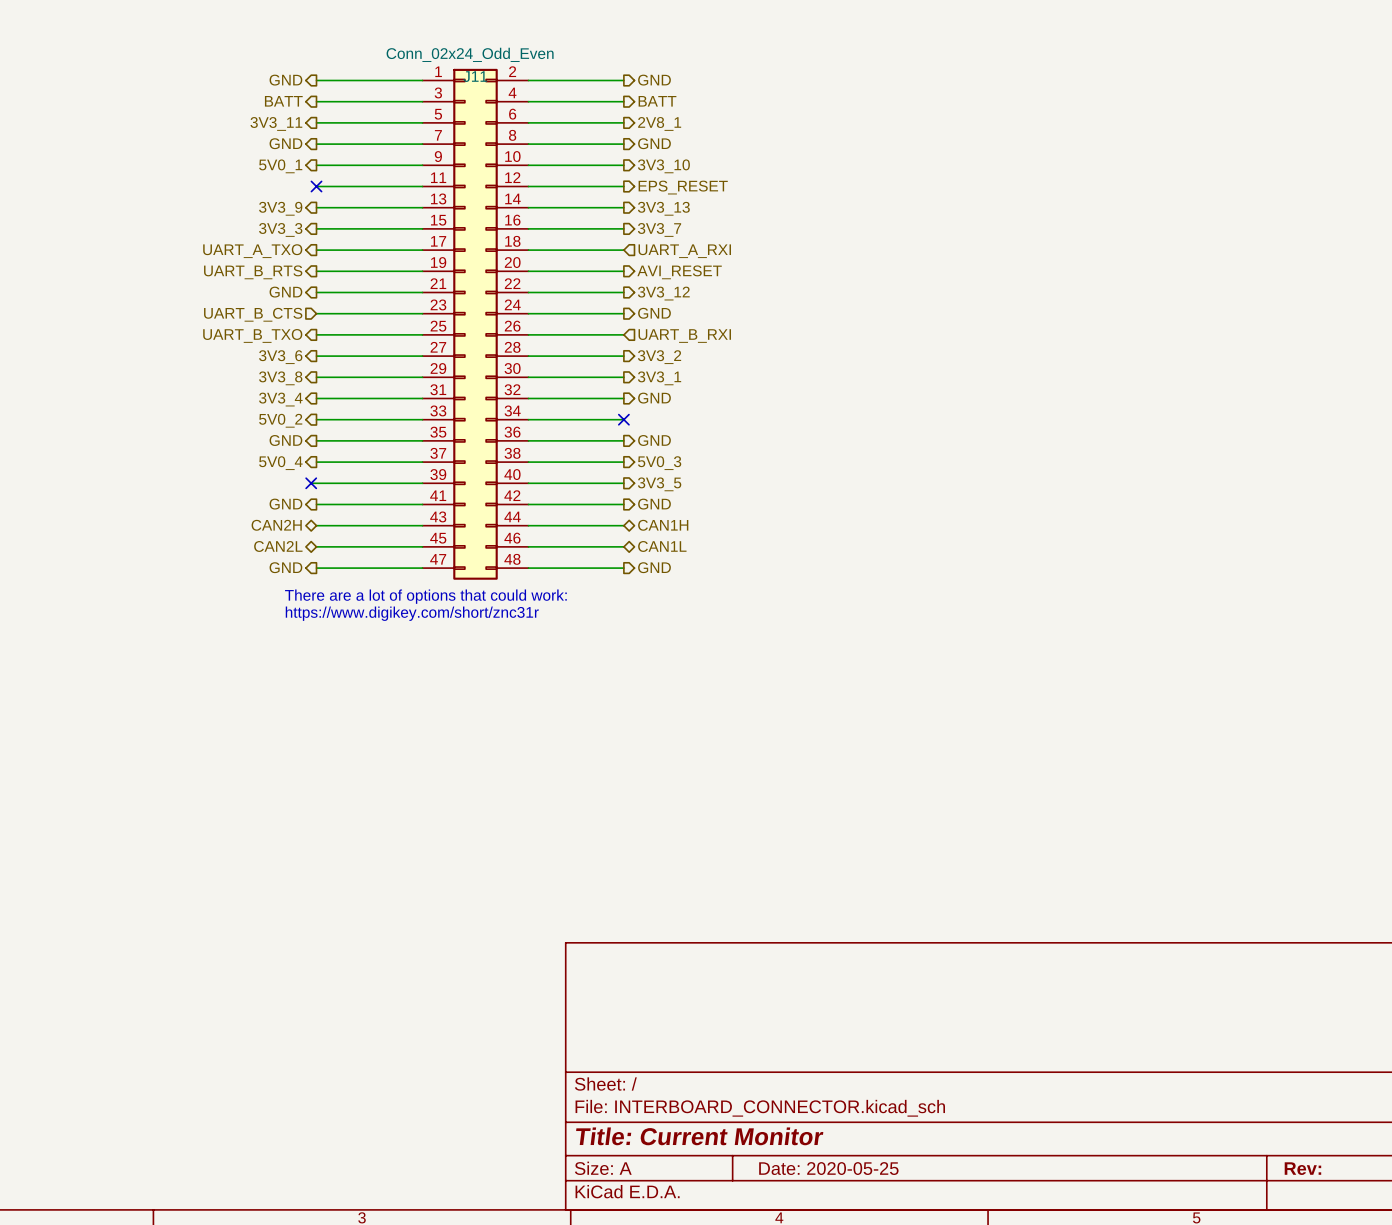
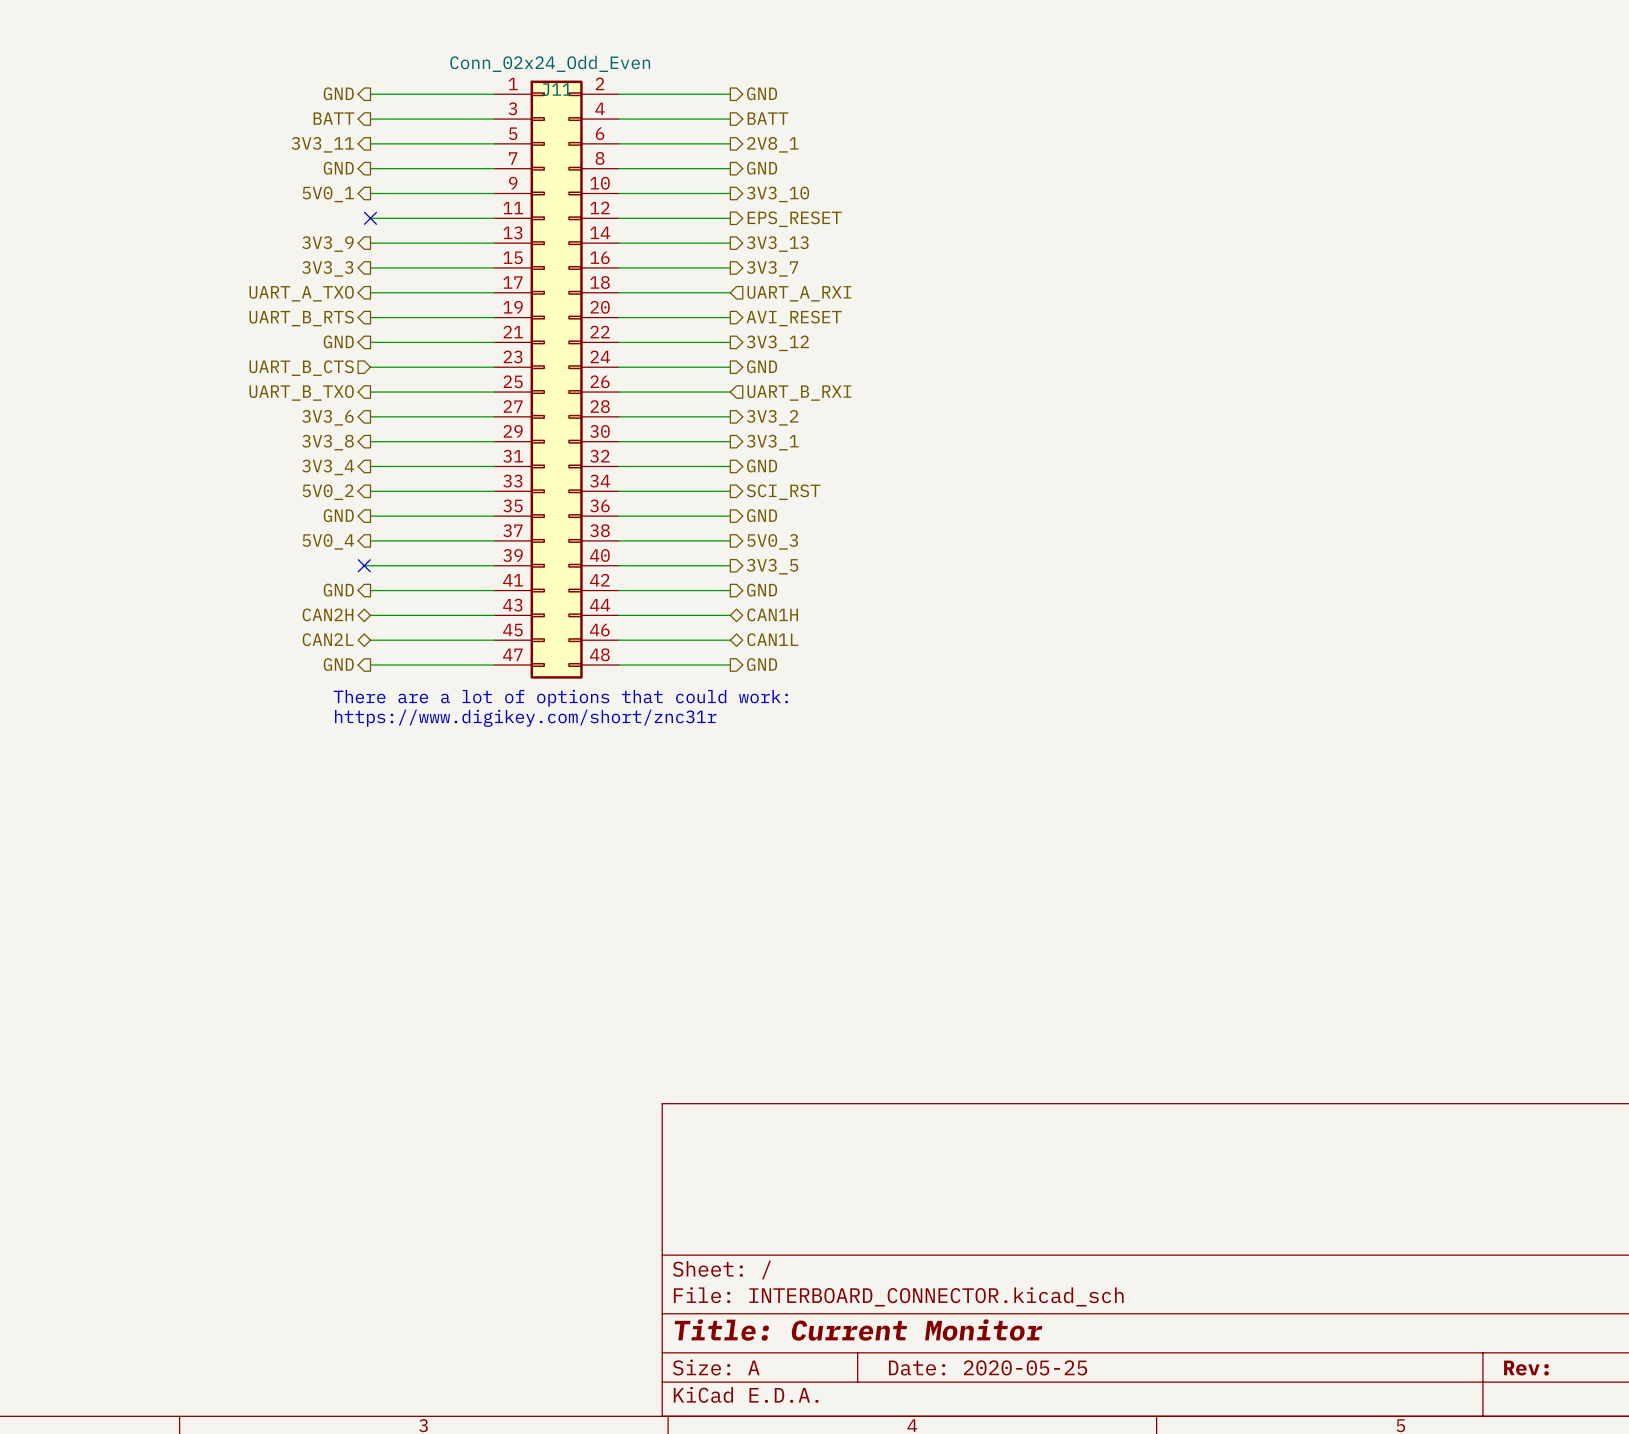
no-connect mark: (623, 419) -> none
hierarchical label: none -> SCI_RST (783, 492)

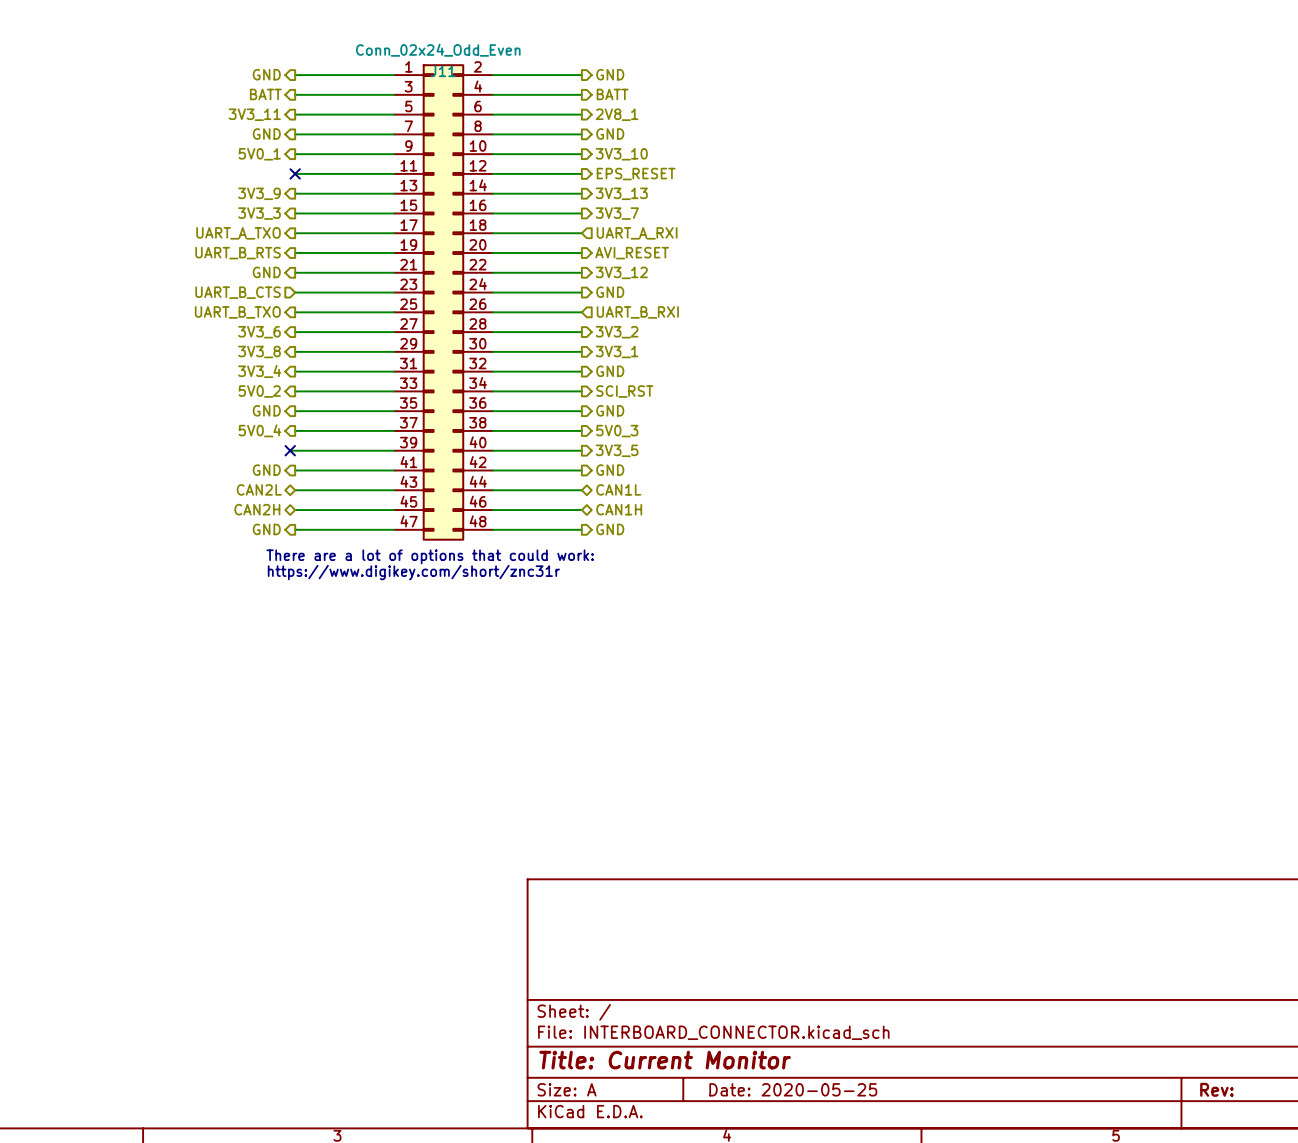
hierarchical label: CAN2H (327, 614) -> CAN2L (259, 489)
hierarchical label: CAN1H (772, 614) -> CAN1L (618, 489)
hierarchical label: CAN2L (328, 639) -> CAN2H (257, 509)
hierarchical label: CAN1L (772, 639) -> CAN1H (619, 509)

